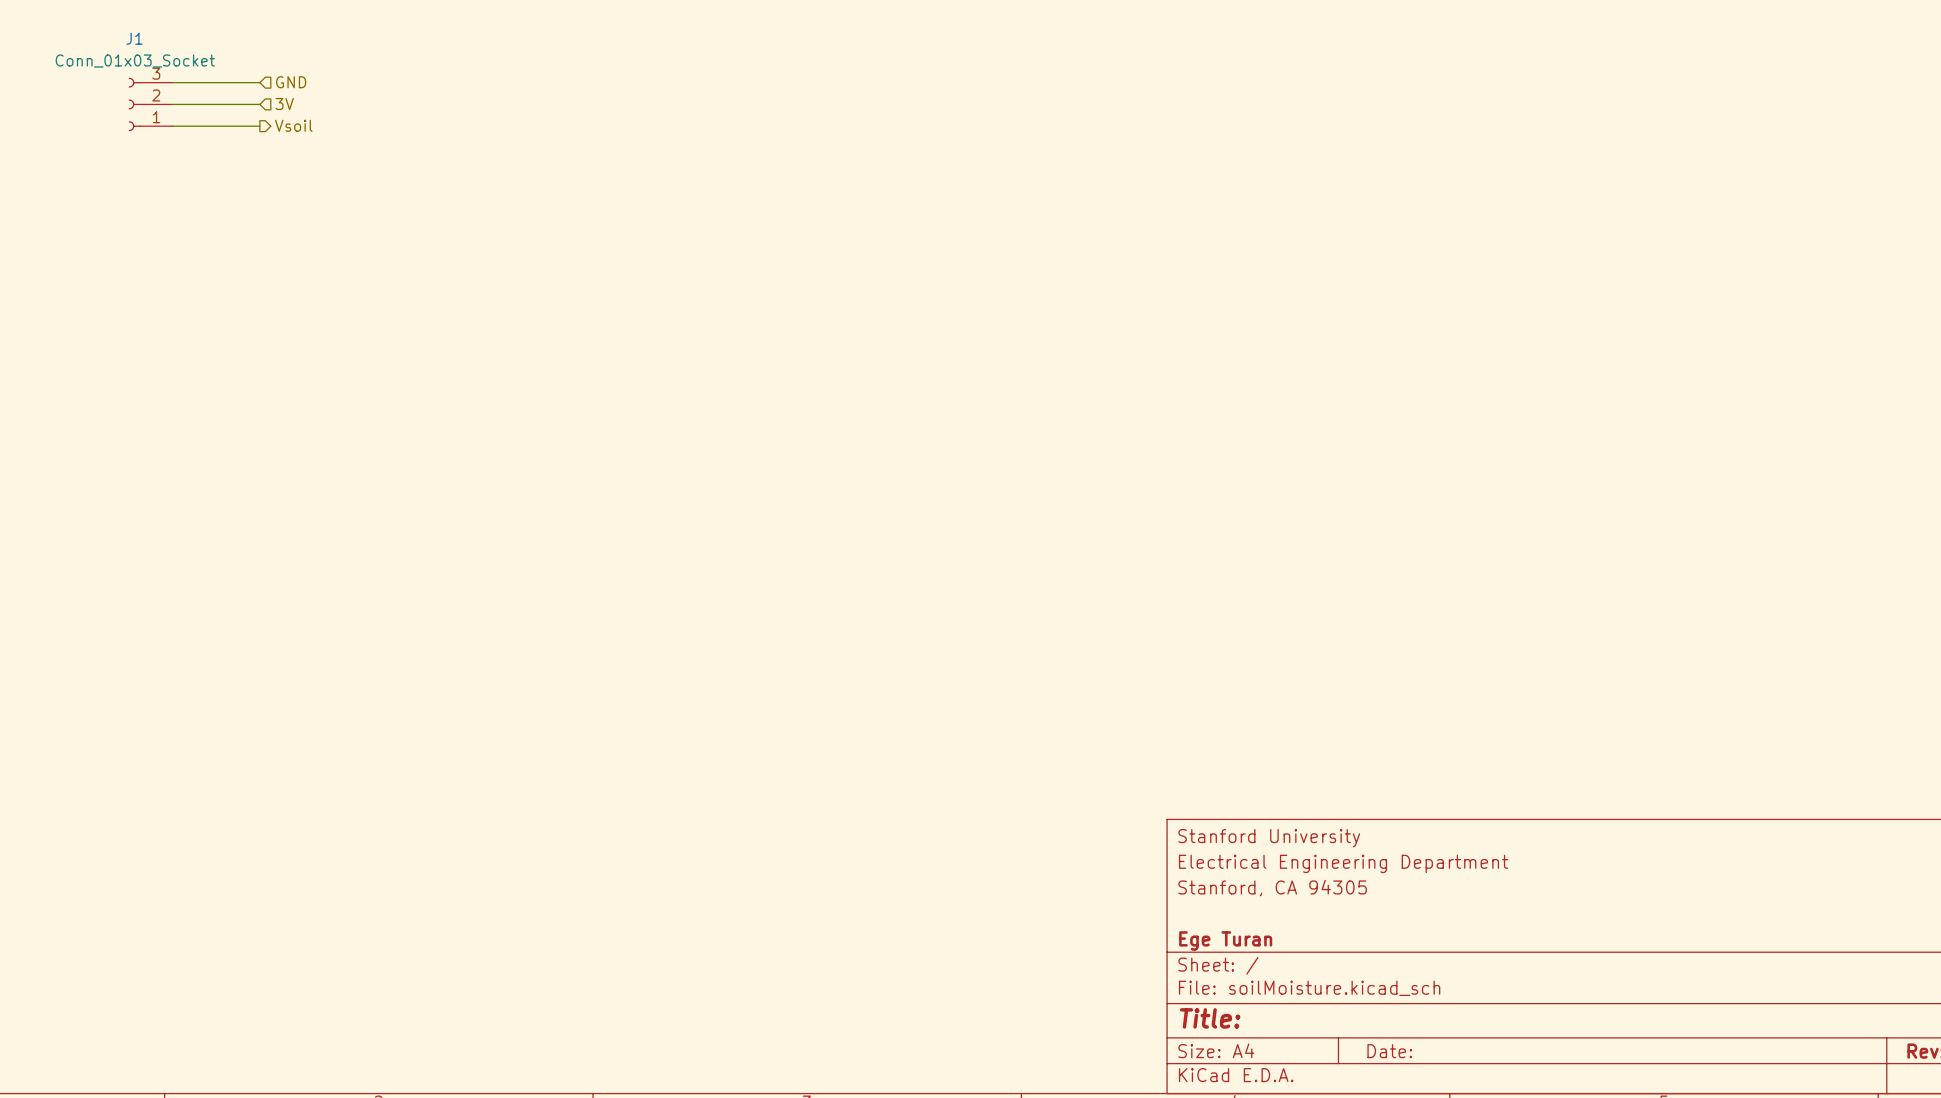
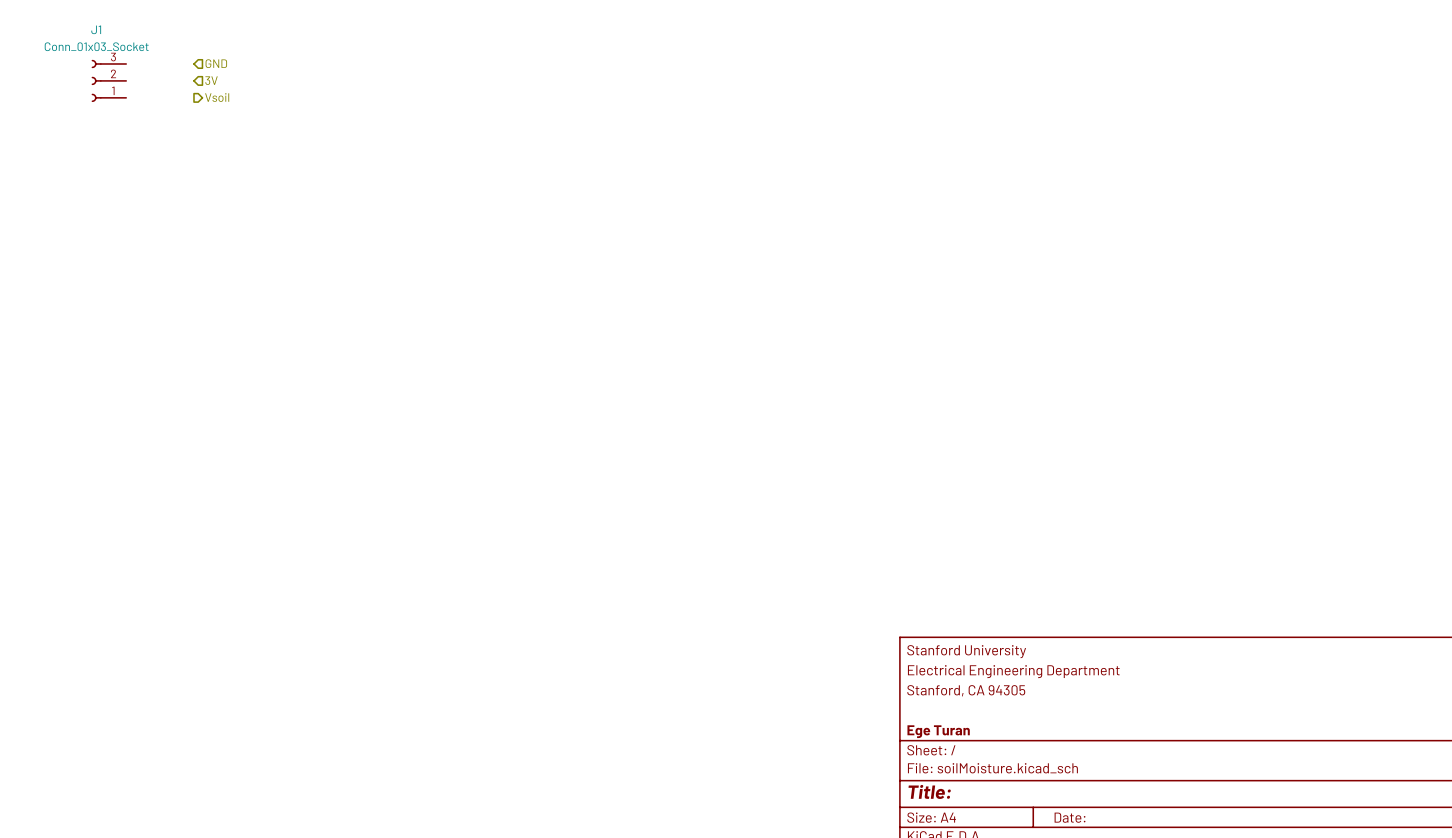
wire: (172, 82) (259, 82) -> none
wire: (172, 104) (259, 104) -> none
wire: (172, 126) (259, 126) -> none

